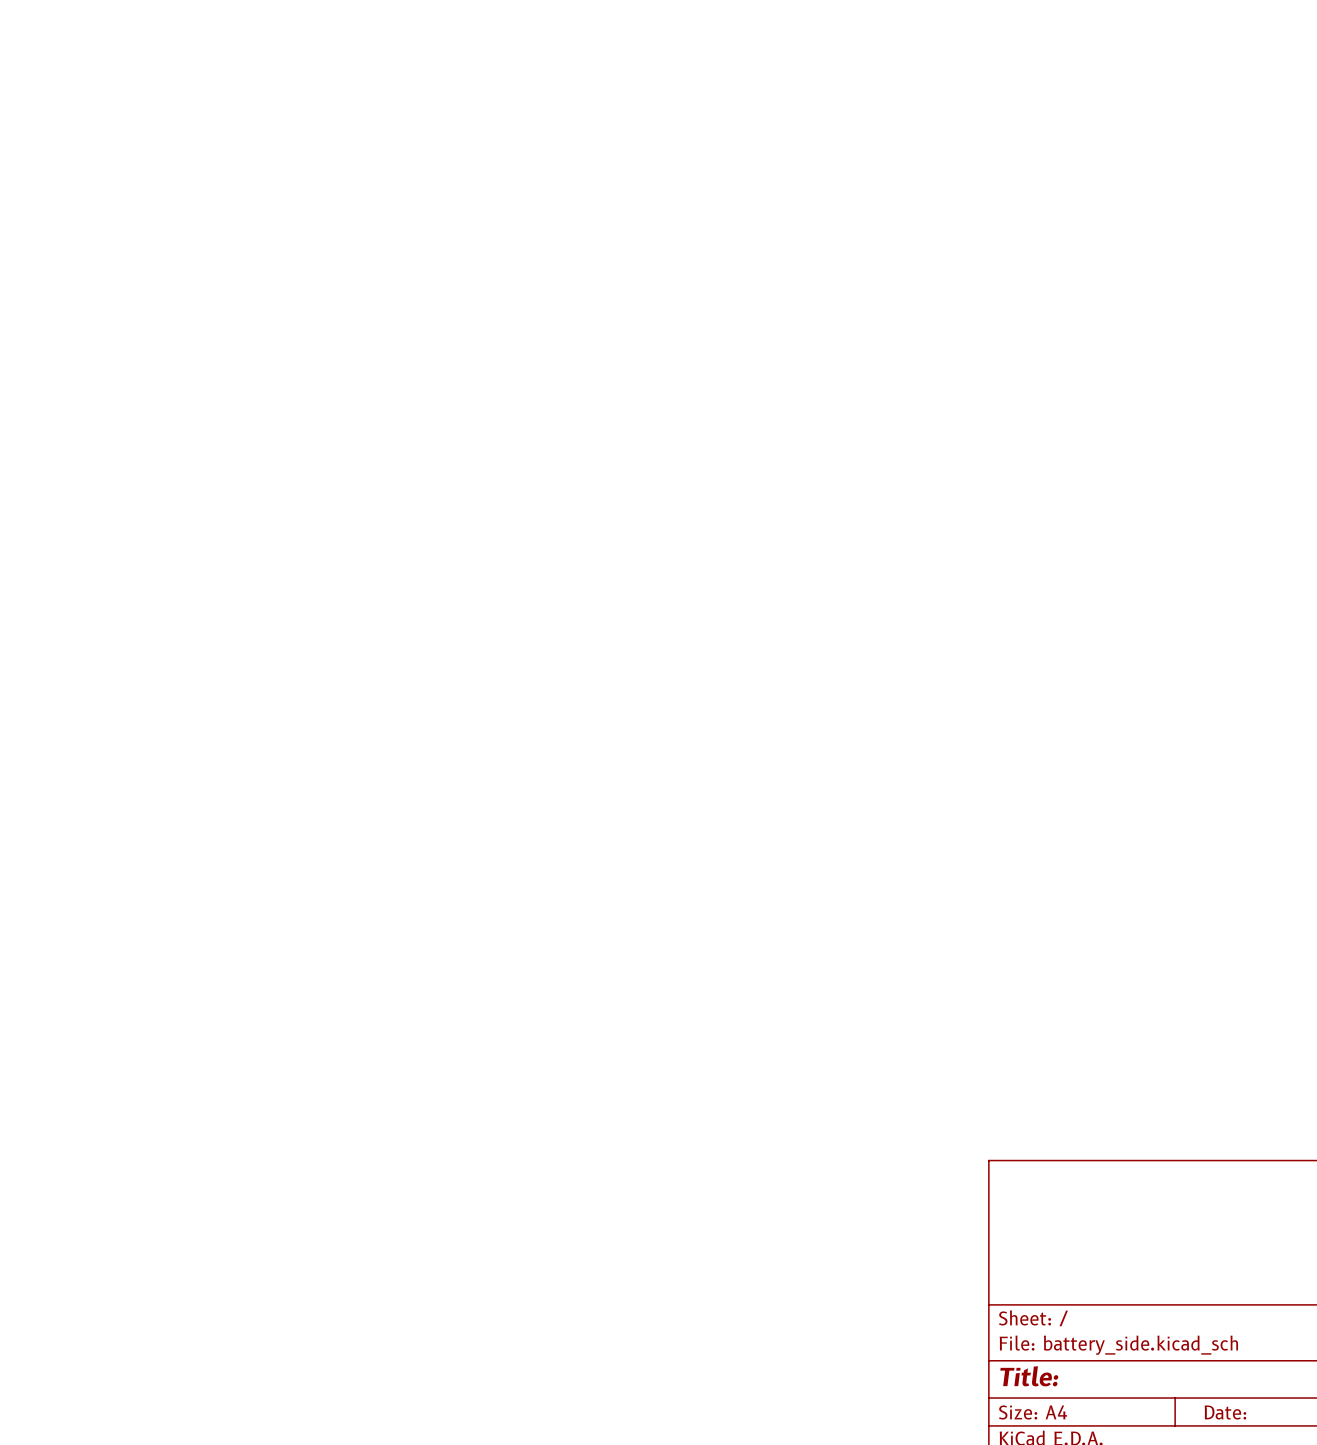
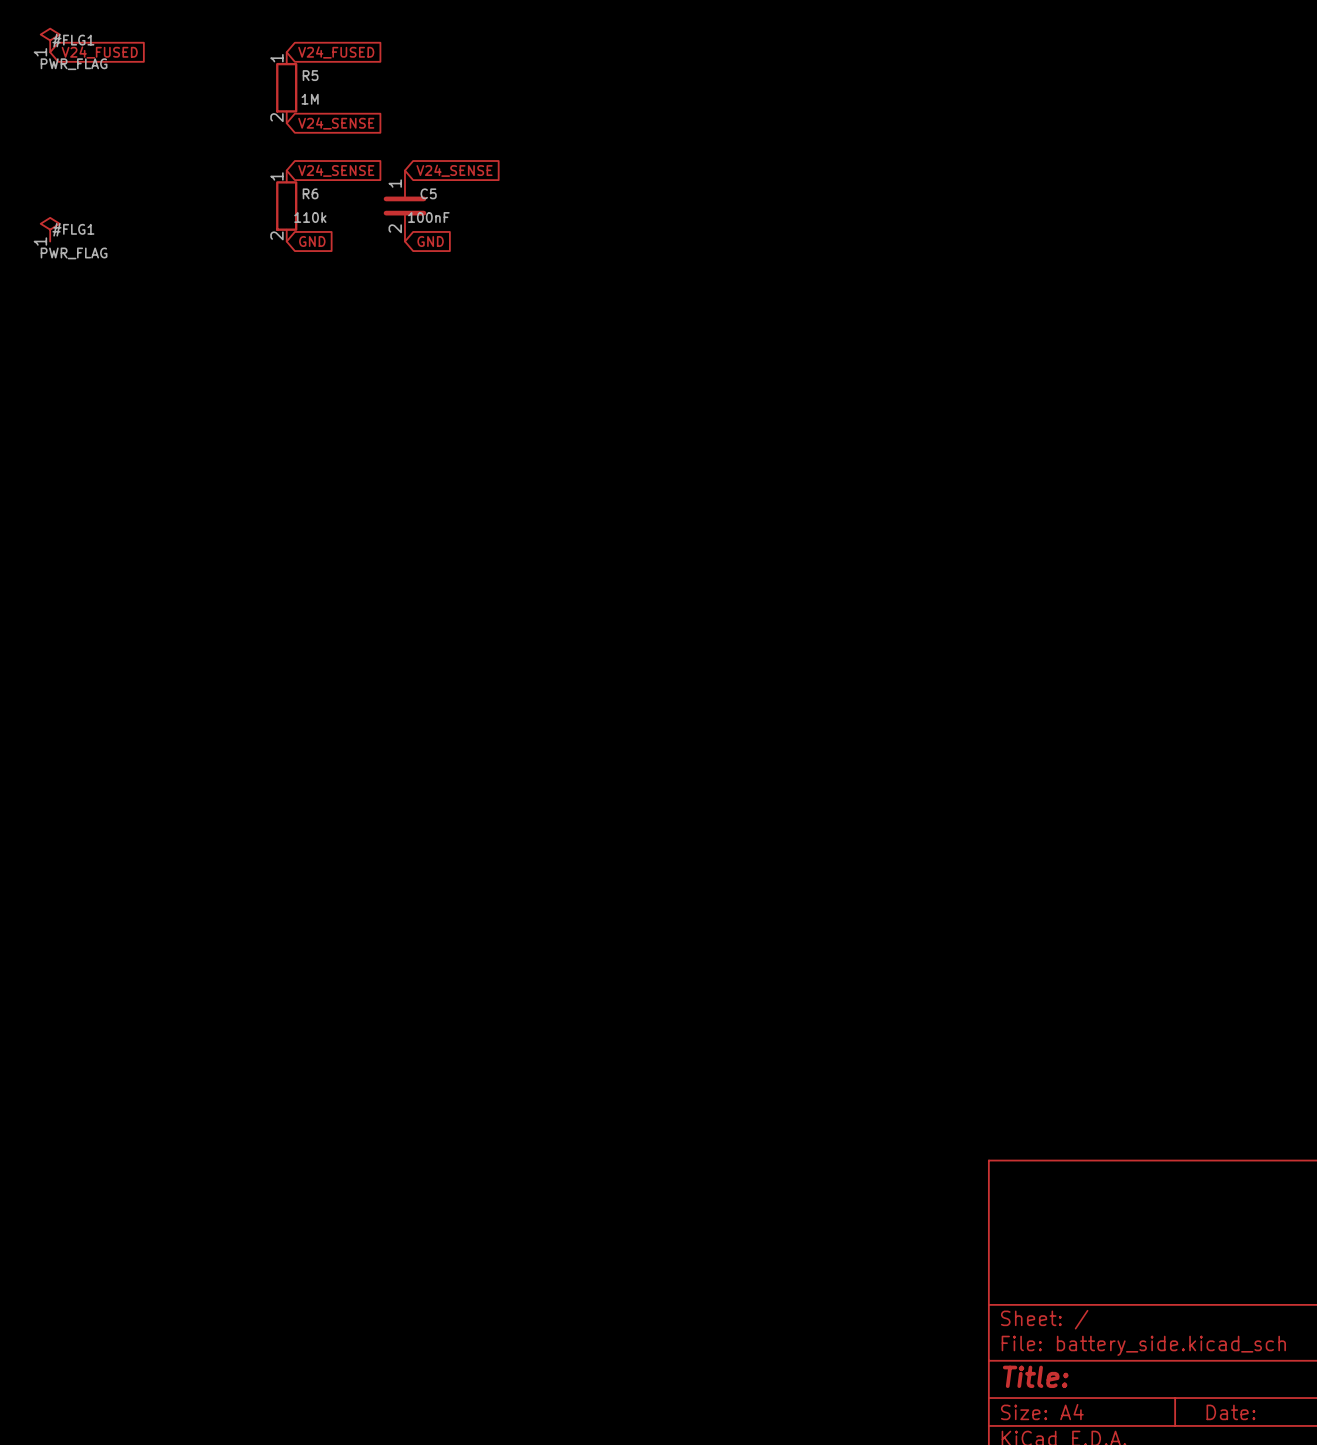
#FLG1: none -> PWR_FLAG (50, 40)
global label: none -> V24_FUSED (99, 52)
global label: none -> V24_FUSED (336, 52)
R5: none -> 1M (286, 87)
global label: none -> V24_SENSE (336, 123)
global label: none -> V24_SENSE (336, 170)
global label: none -> V24_SENSE (454, 170)
R6: none -> 110k (286, 206)
C5: none -> 100nF (404, 206)
#FLG1: none -> PWR_FLAG (50, 229)
global label: none -> GND (312, 241)
global label: none -> GND (430, 241)

